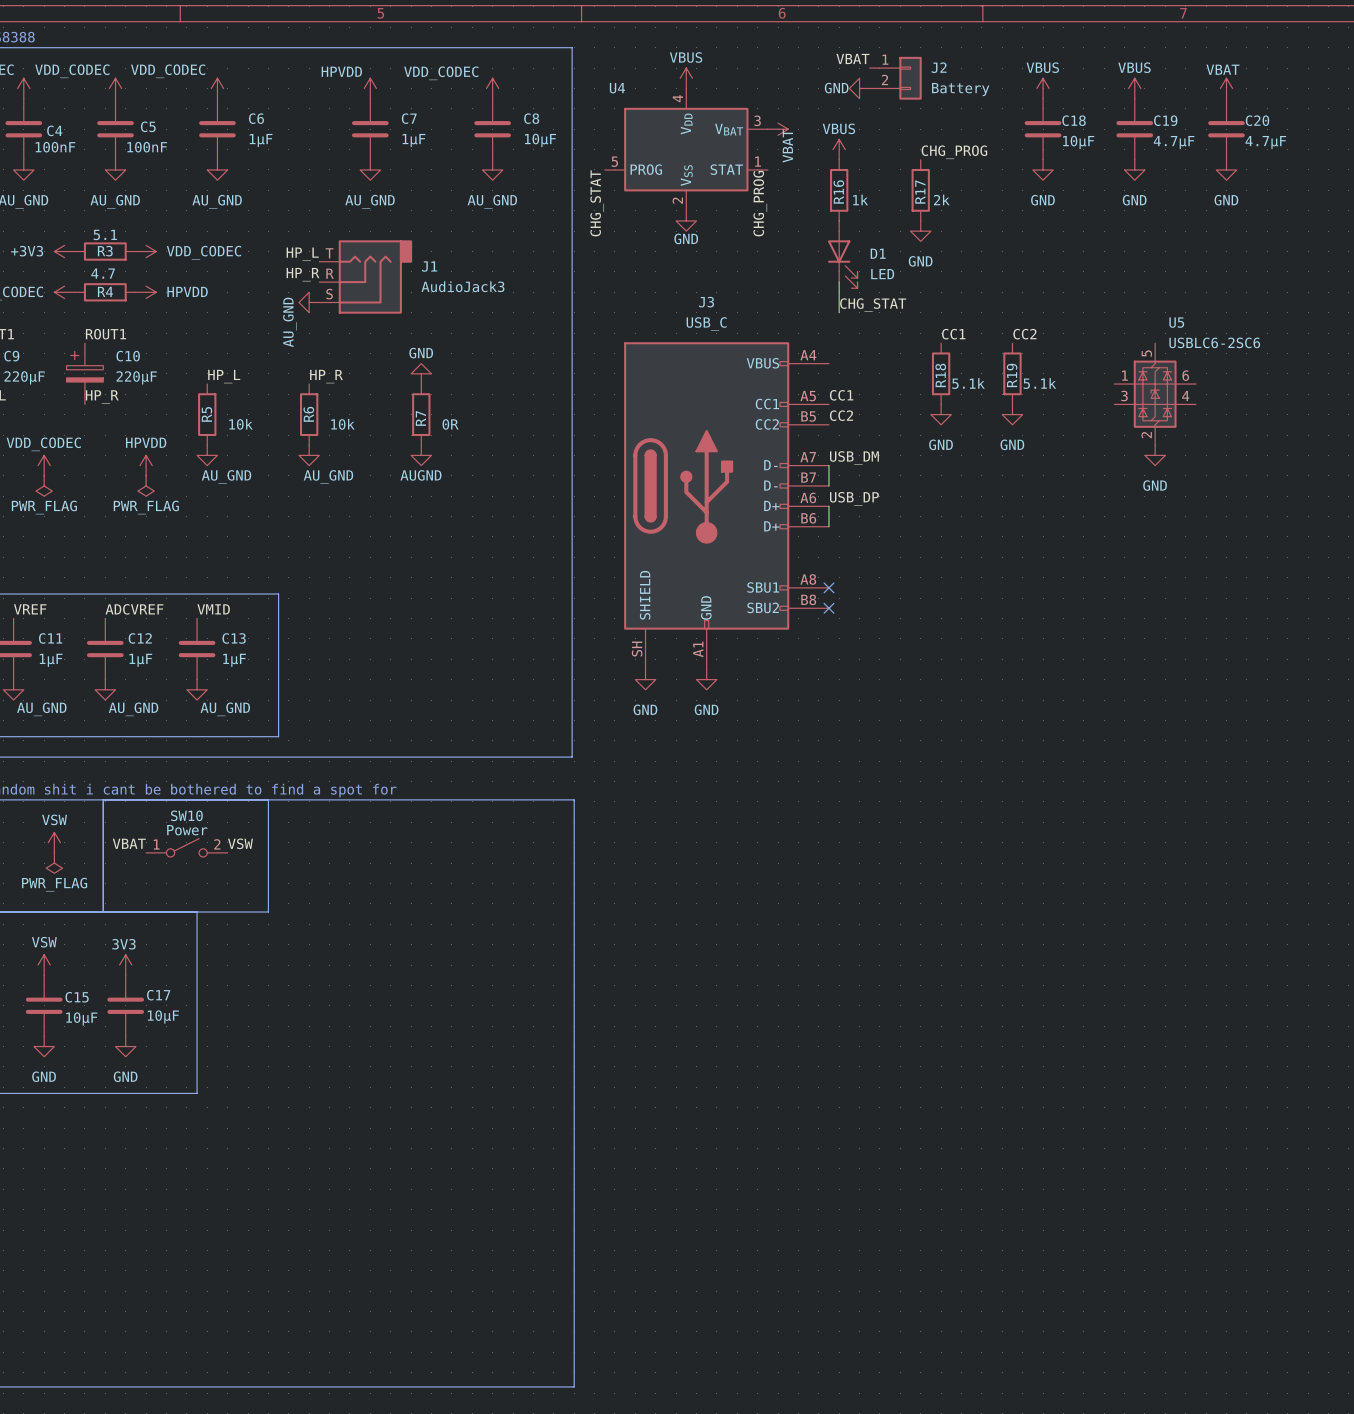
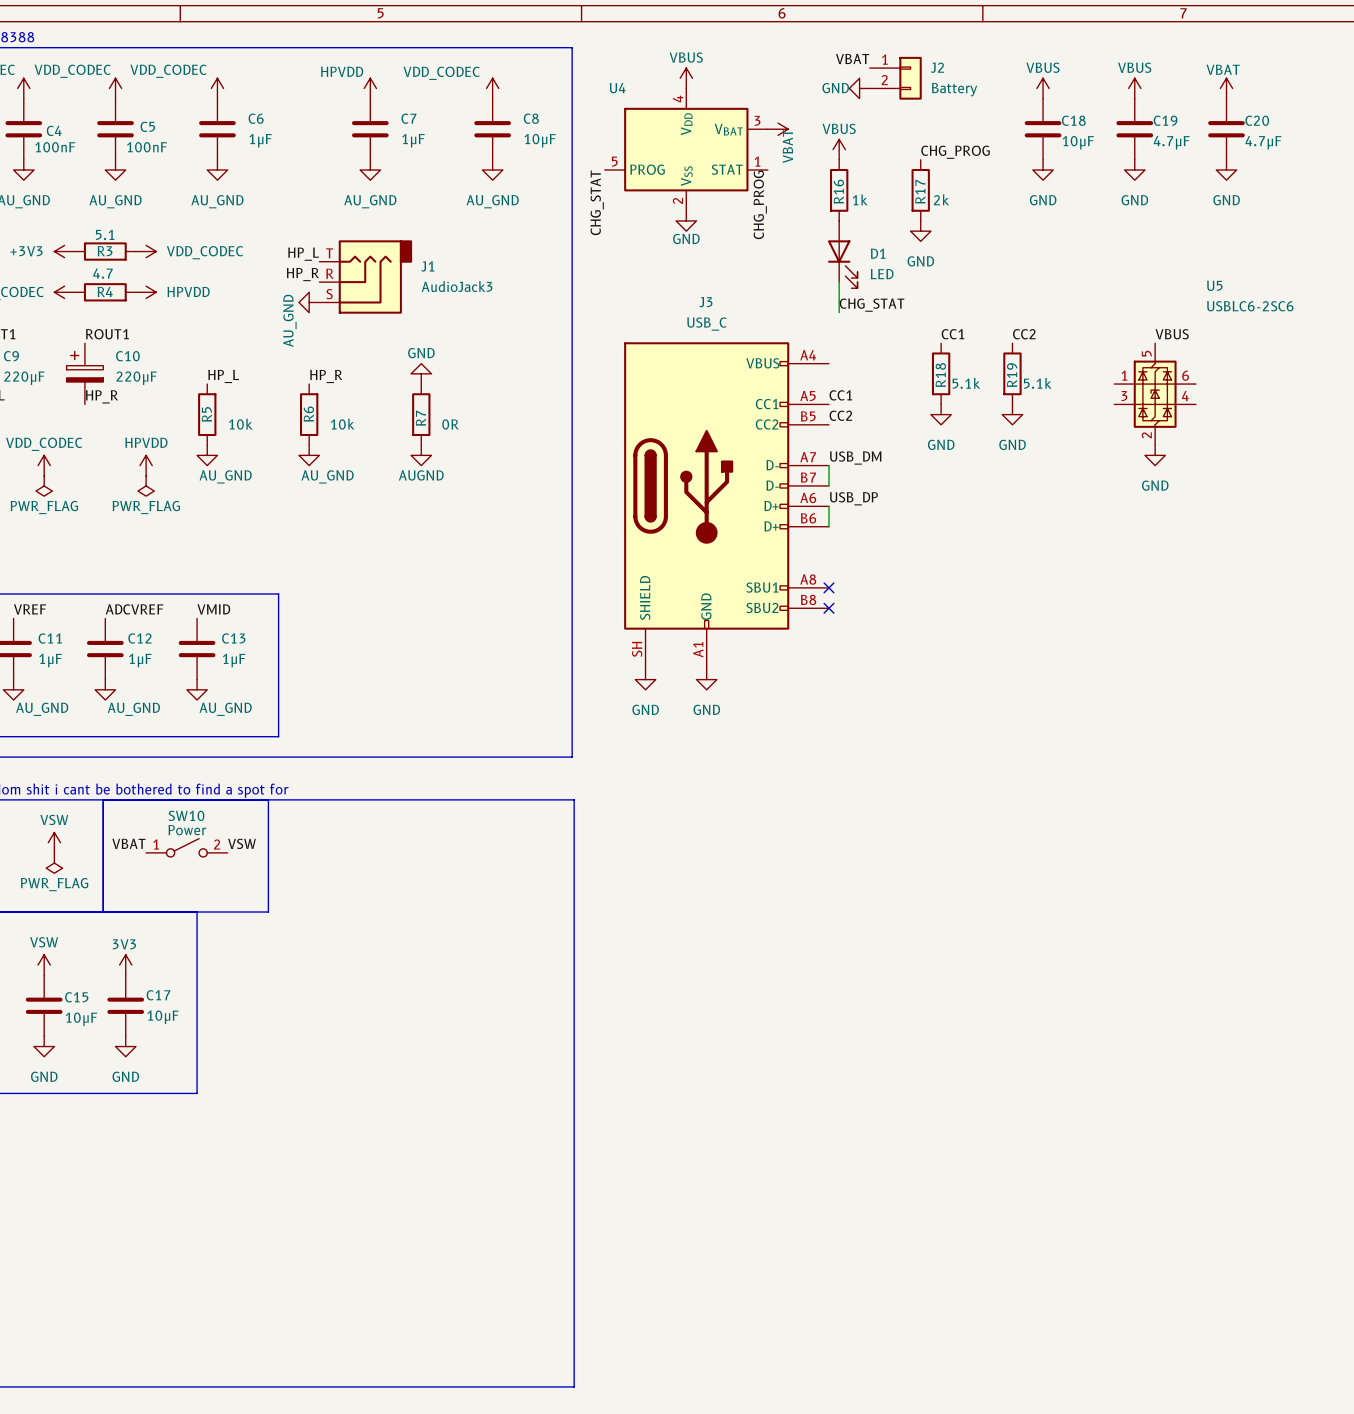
U5 name position: U5 (1176, 322) -> U5 (1214, 285)
label: none -> VBUS (1172, 334)
U5 value position: USBLC6-2SC6 (1214, 342) -> USBLC6-2SC6 (1250, 306)

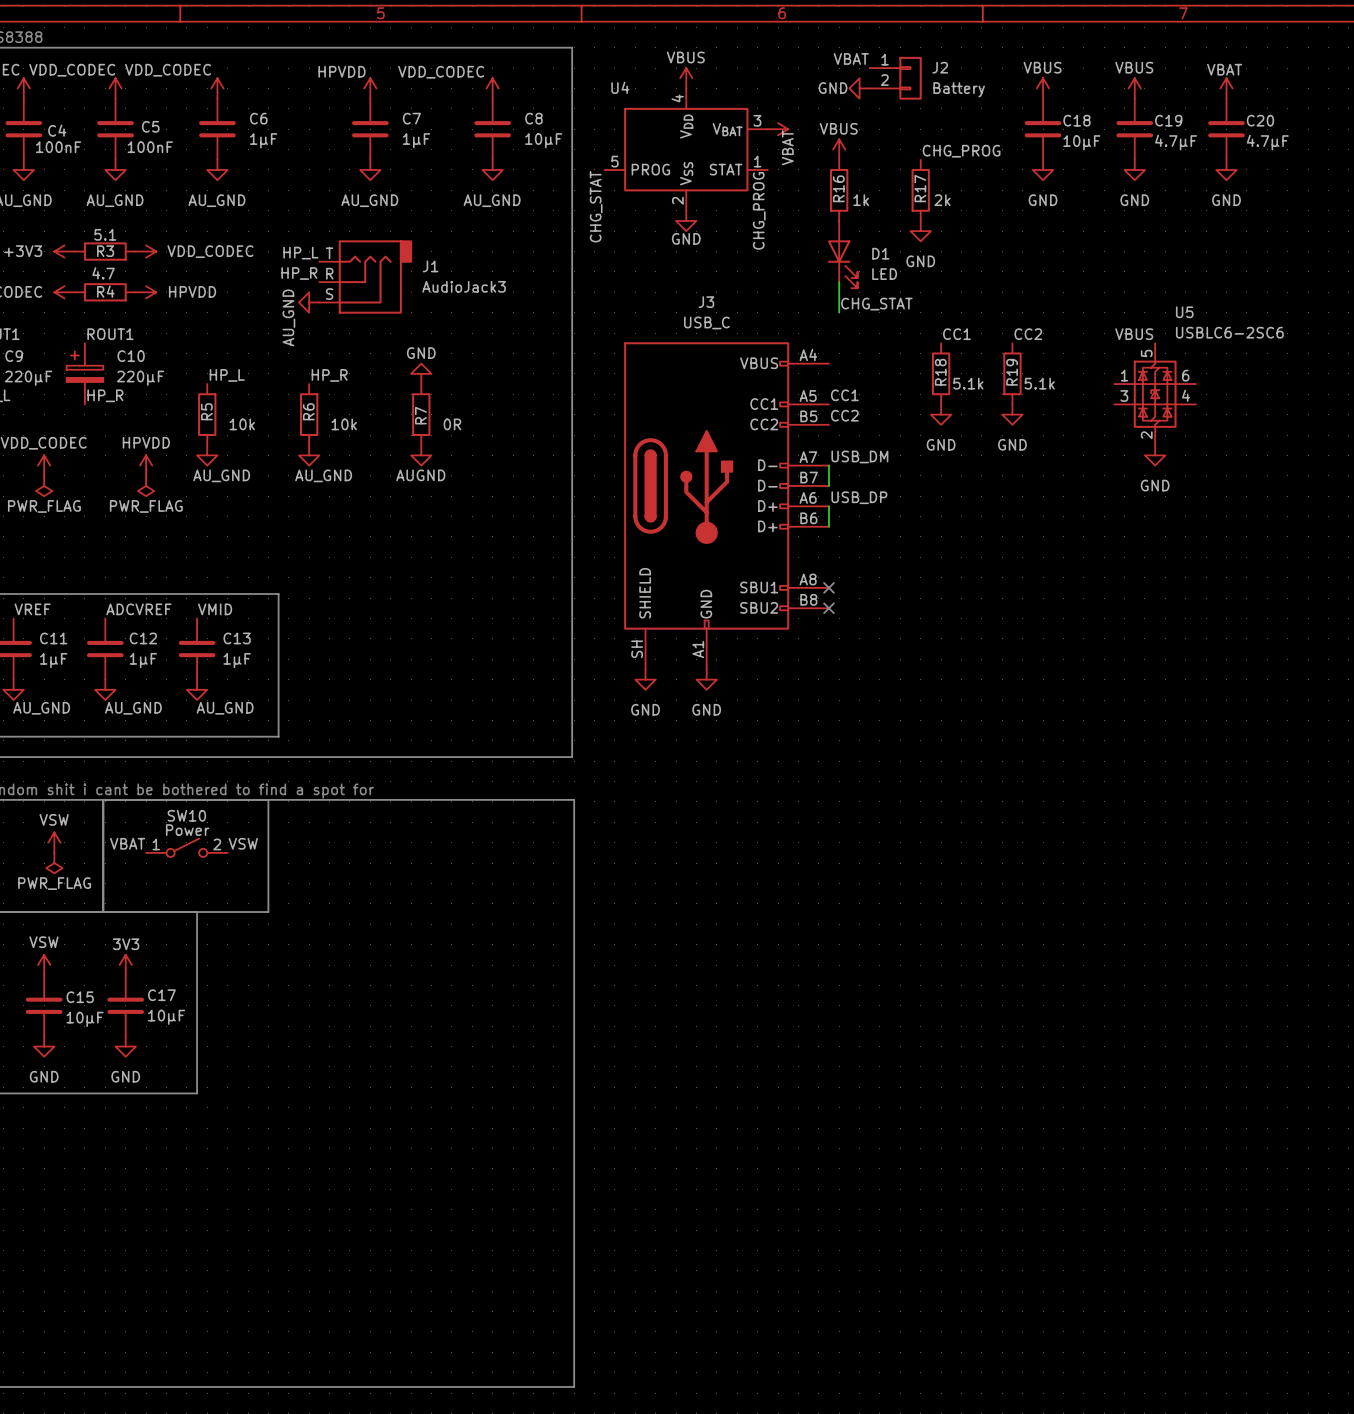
U5 name position: U5 (1214, 285) -> U5 (1184, 312)
U5 value position: USBLC6-2SC6 (1250, 306) -> USBLC6-2SC6 (1229, 332)
label position: VBUS (1172, 334) -> VBUS (1134, 334)

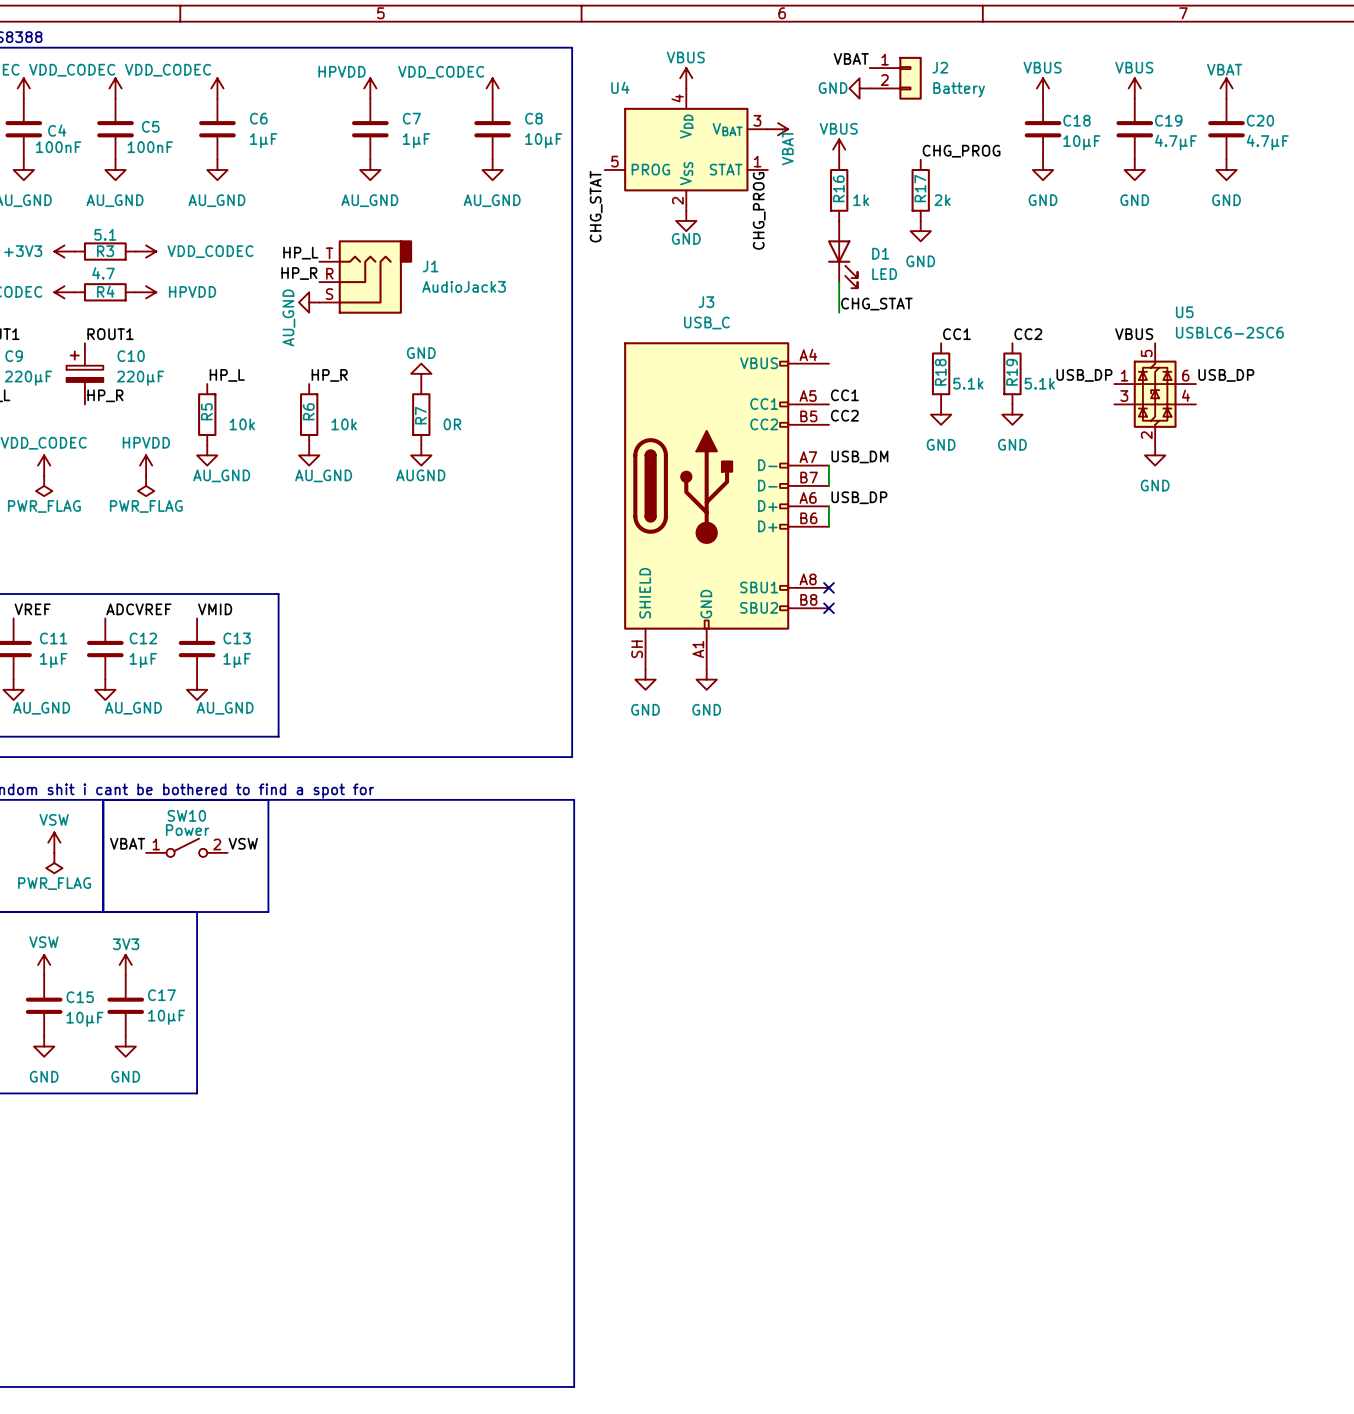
label: none -> USB_DP (1084, 375)
label: none -> USB_DP (1226, 375)

